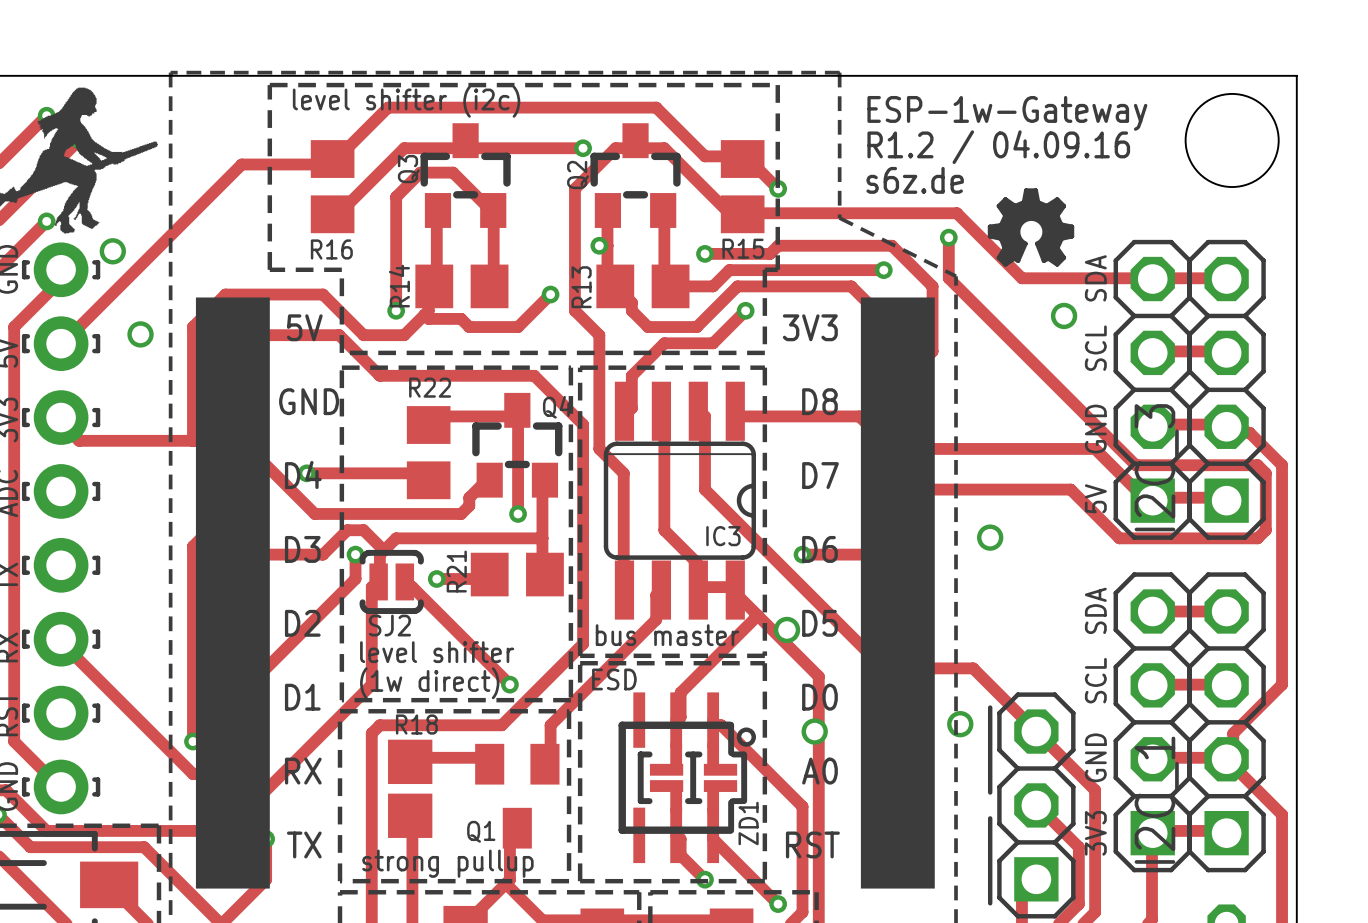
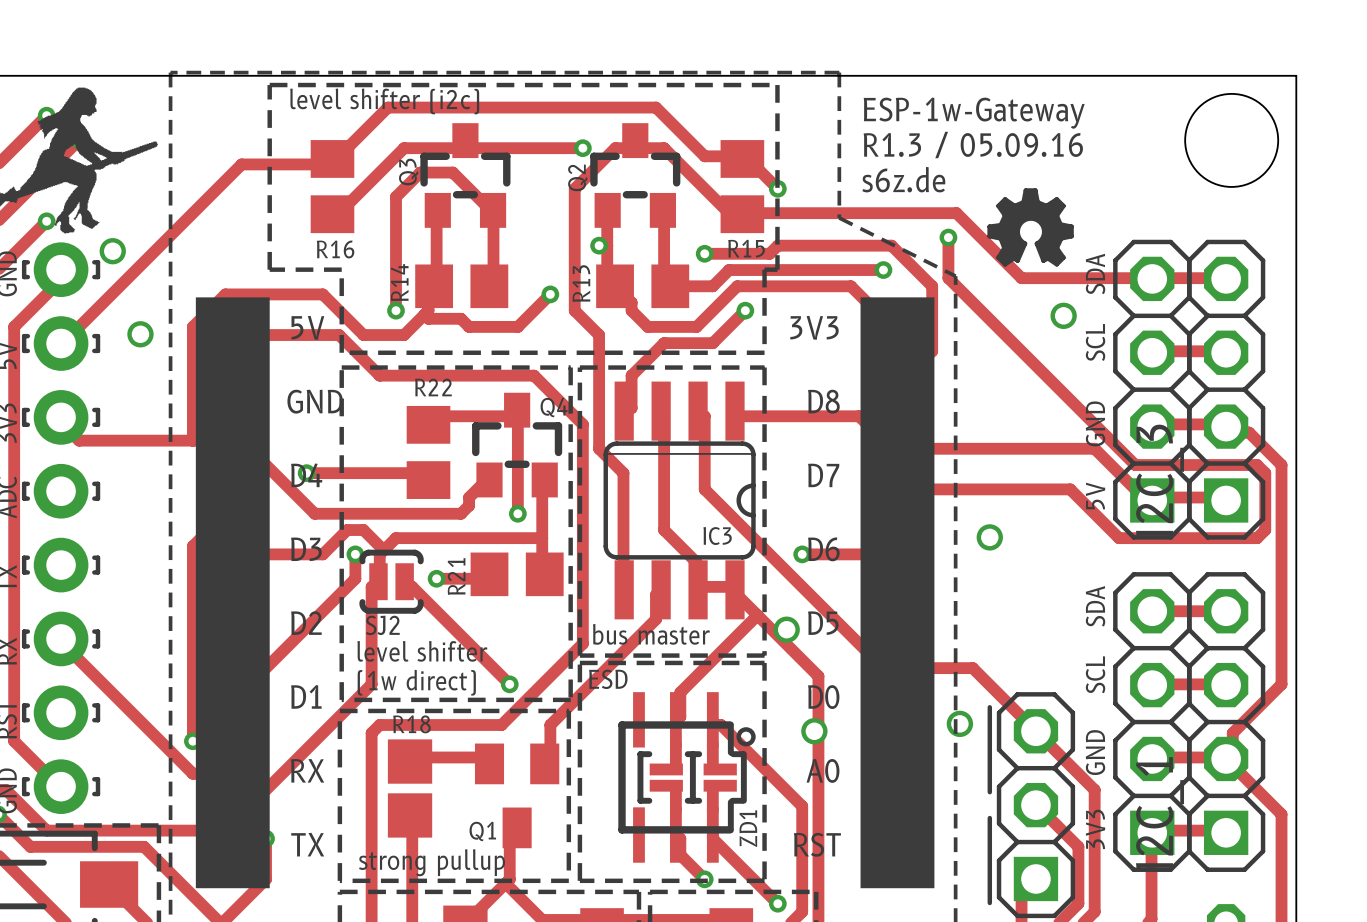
text: R1.2 / 04.09.16 (998, 147) -> R1.3 / 05.09.16 (973, 145)

